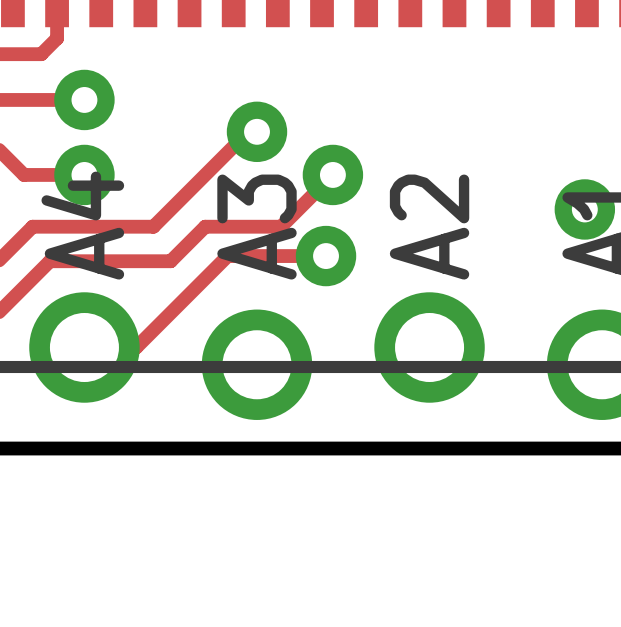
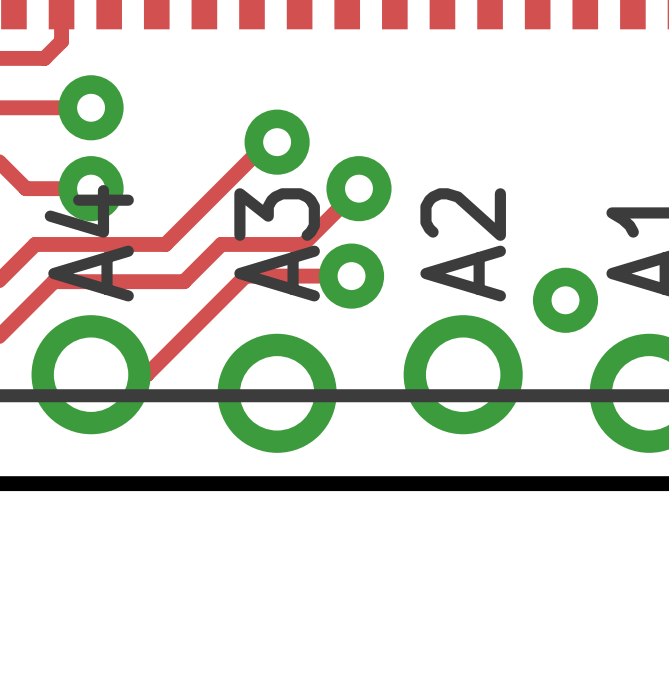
via position: (584, 209) -> (565, 300)

